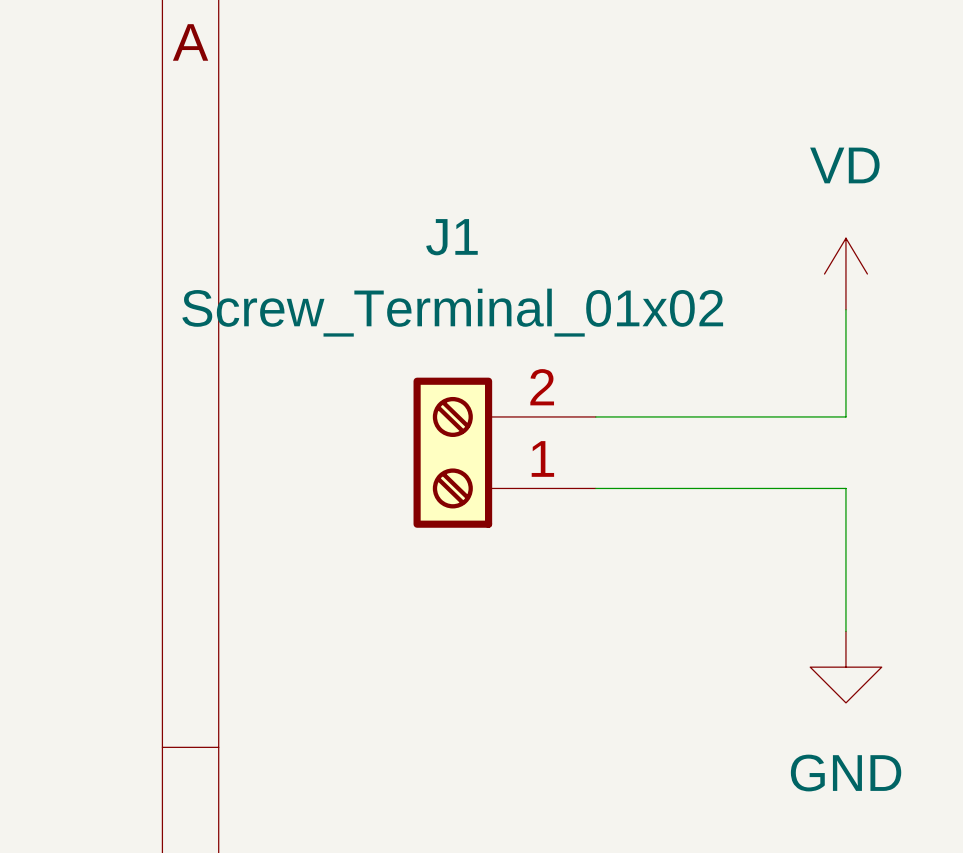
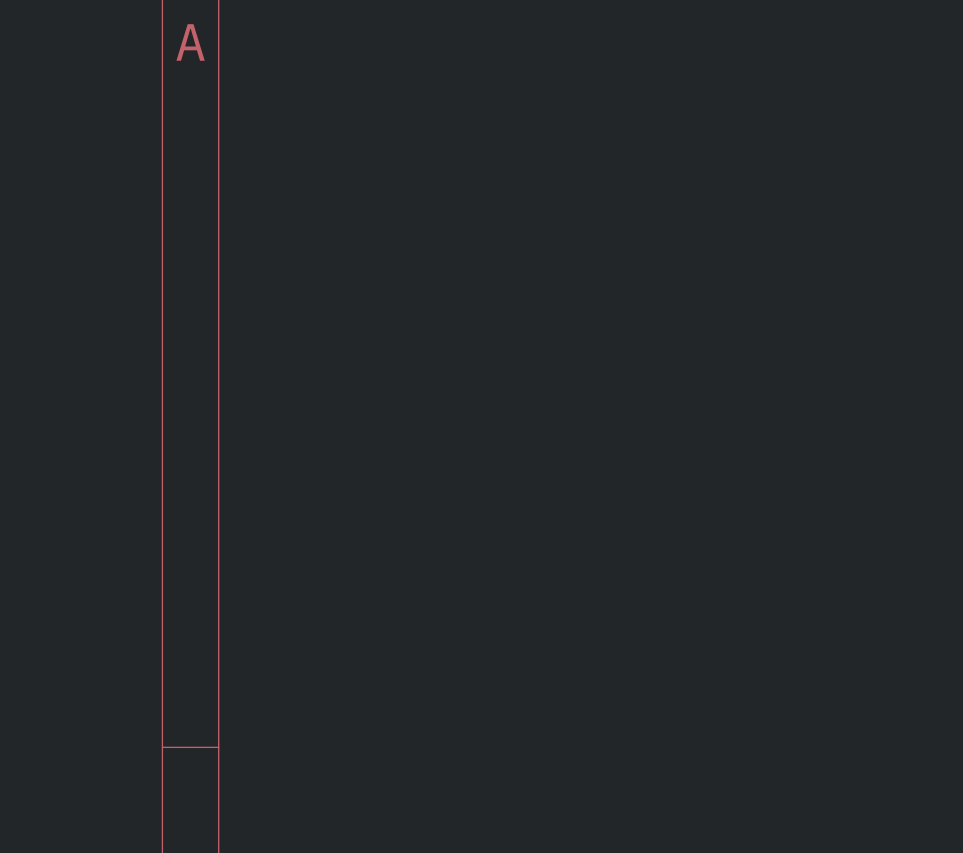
power symbol: VD (845, 274) -> none
wire: (845, 309) (845, 416) (595, 416) -> none
J1: Screw_Terminal_01x02 (504, 452) -> none
wire: (595, 488) (845, 488) (845, 631) -> none
power symbol: GND (845, 667) -> none

